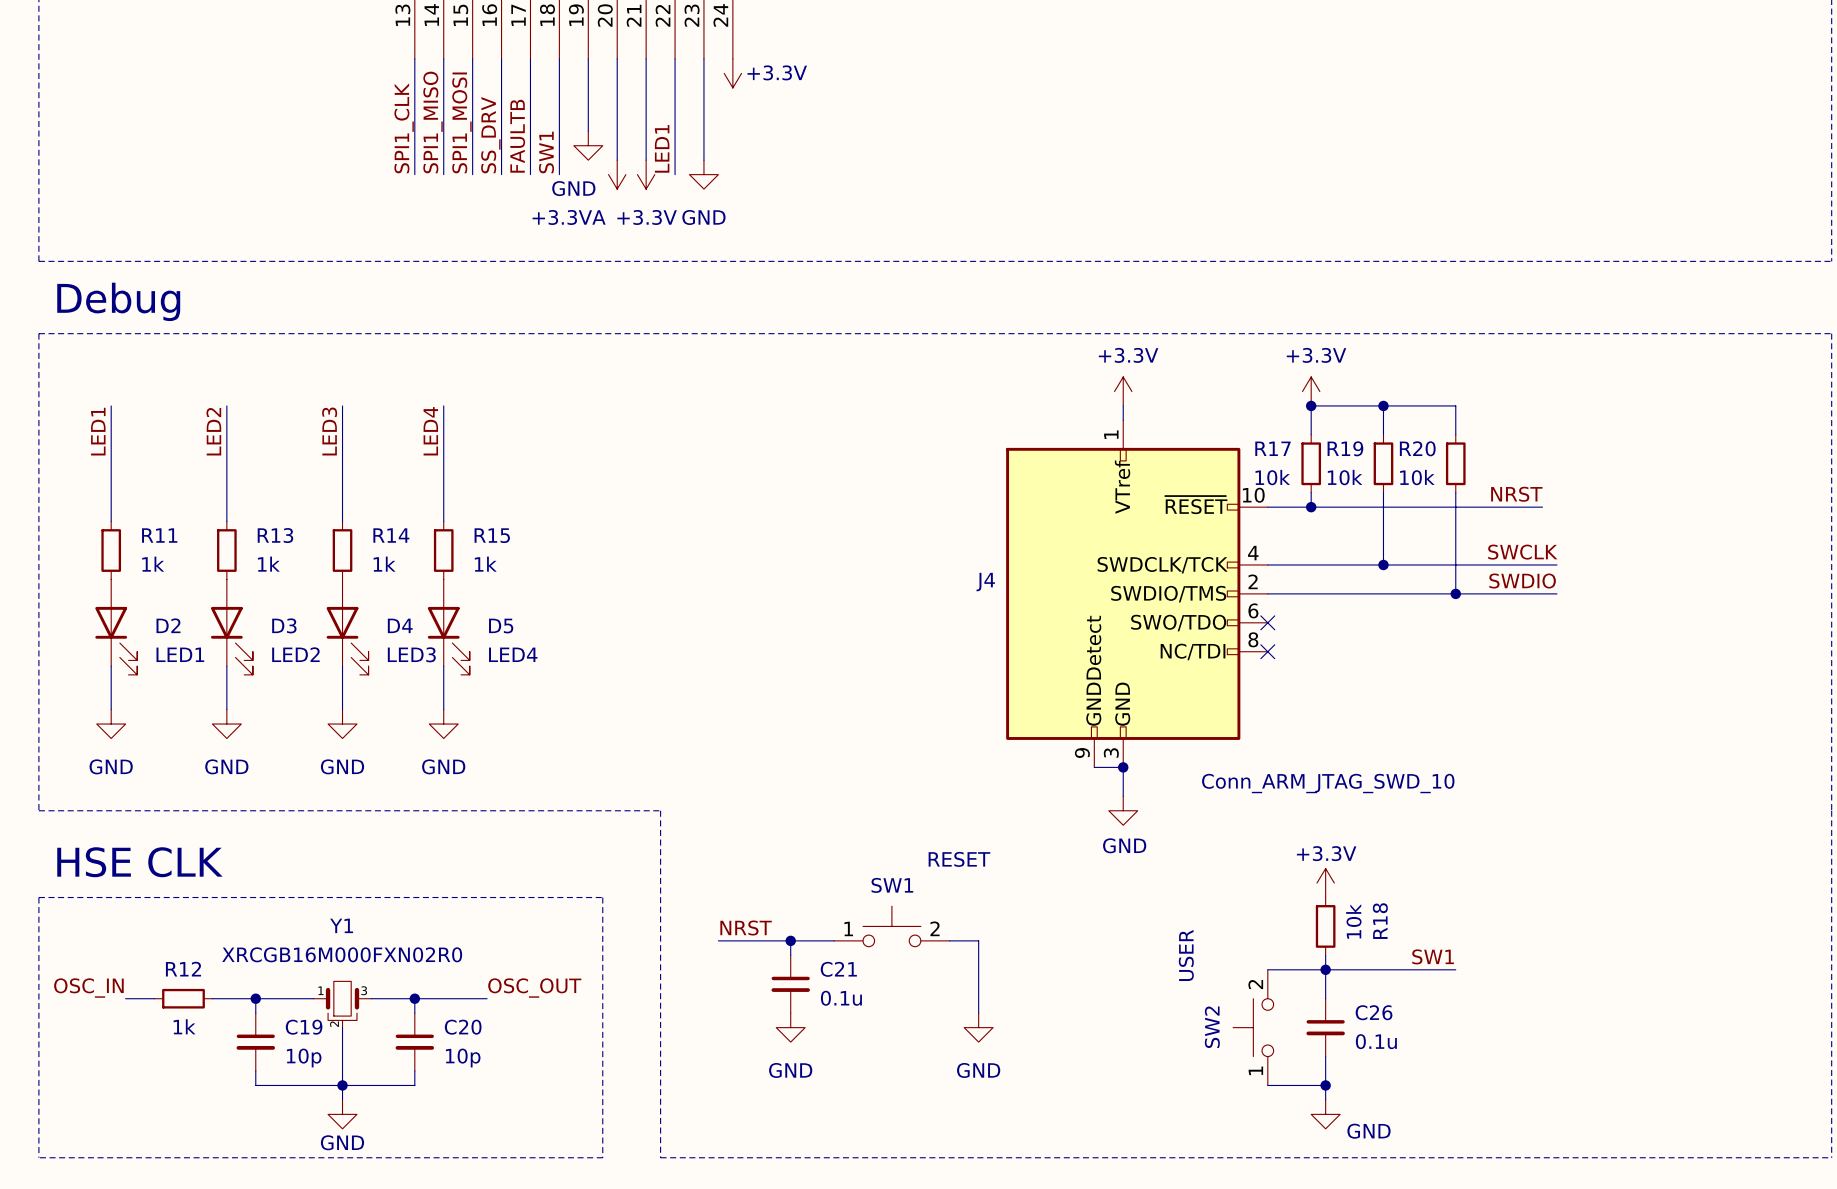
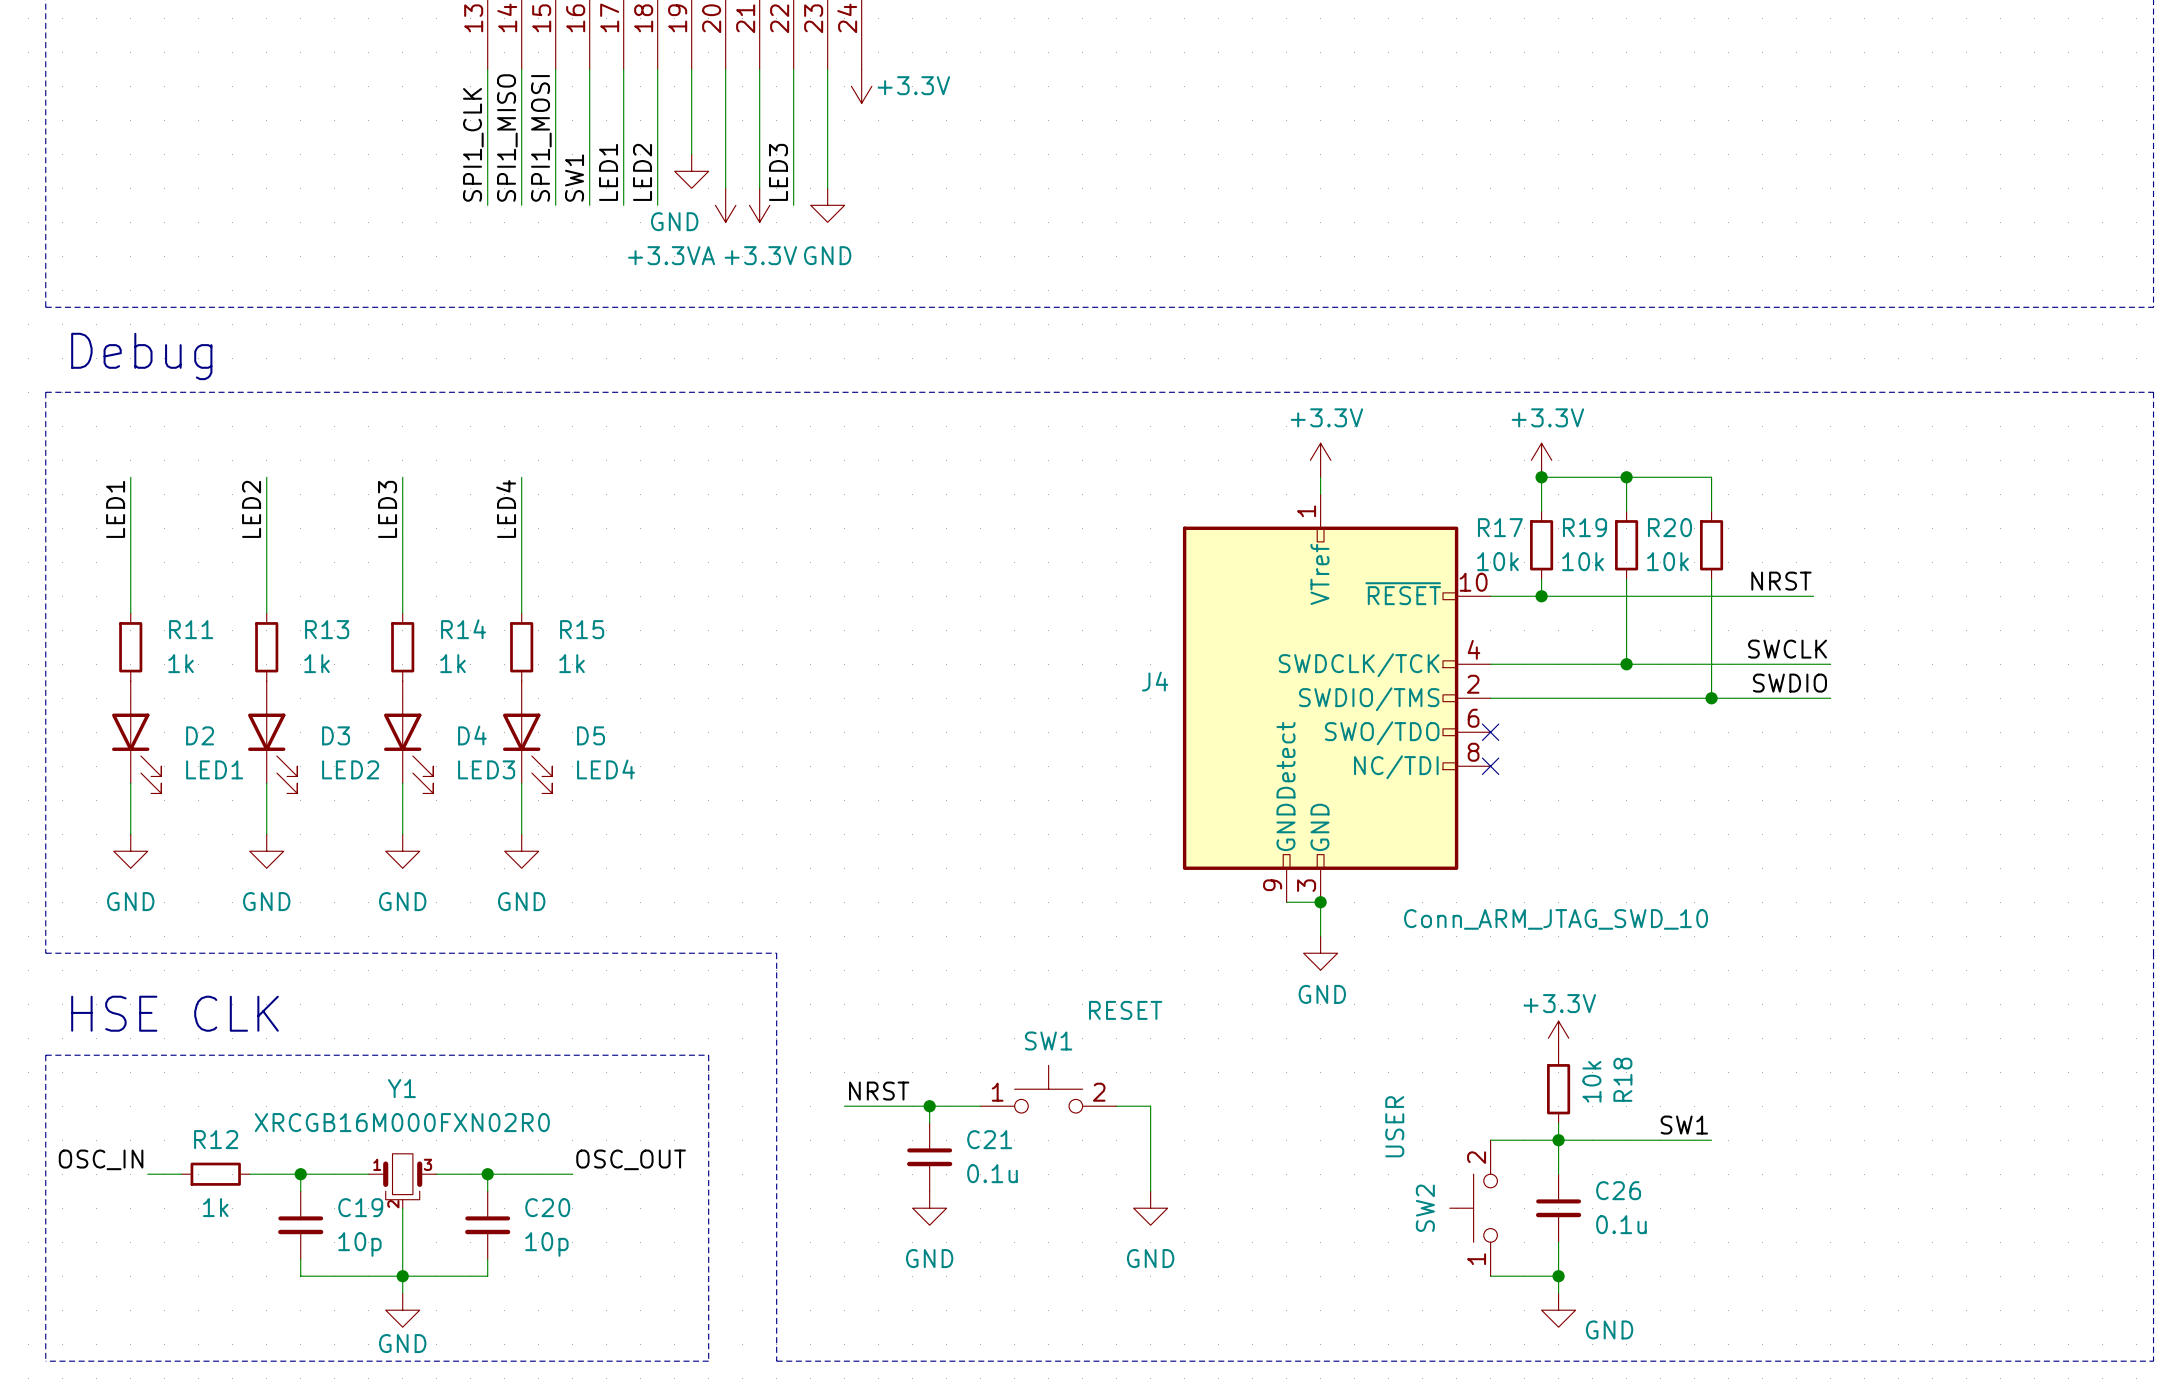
label: SS_DRV (490, 135) -> SW1 (574, 178)
label: FAULTB (517, 136) -> LED1 (608, 172)
label: LED1 (662, 148) -> LED3 (778, 172)
label: SW1 (546, 152) -> LED2 (642, 172)

